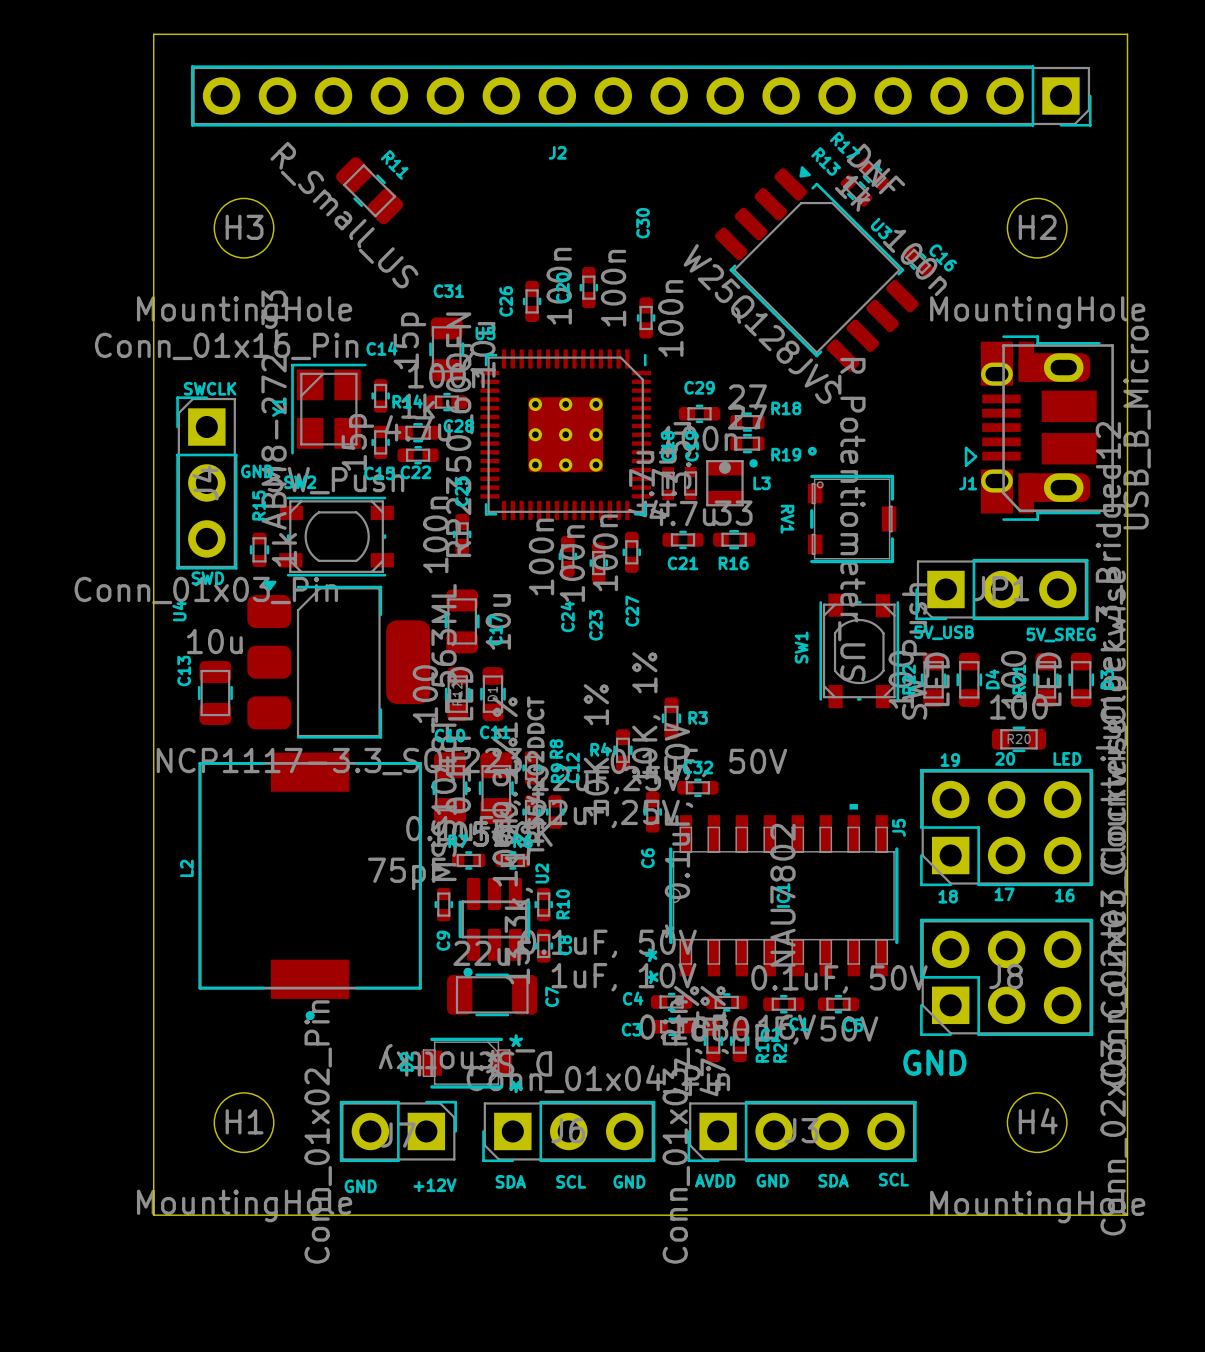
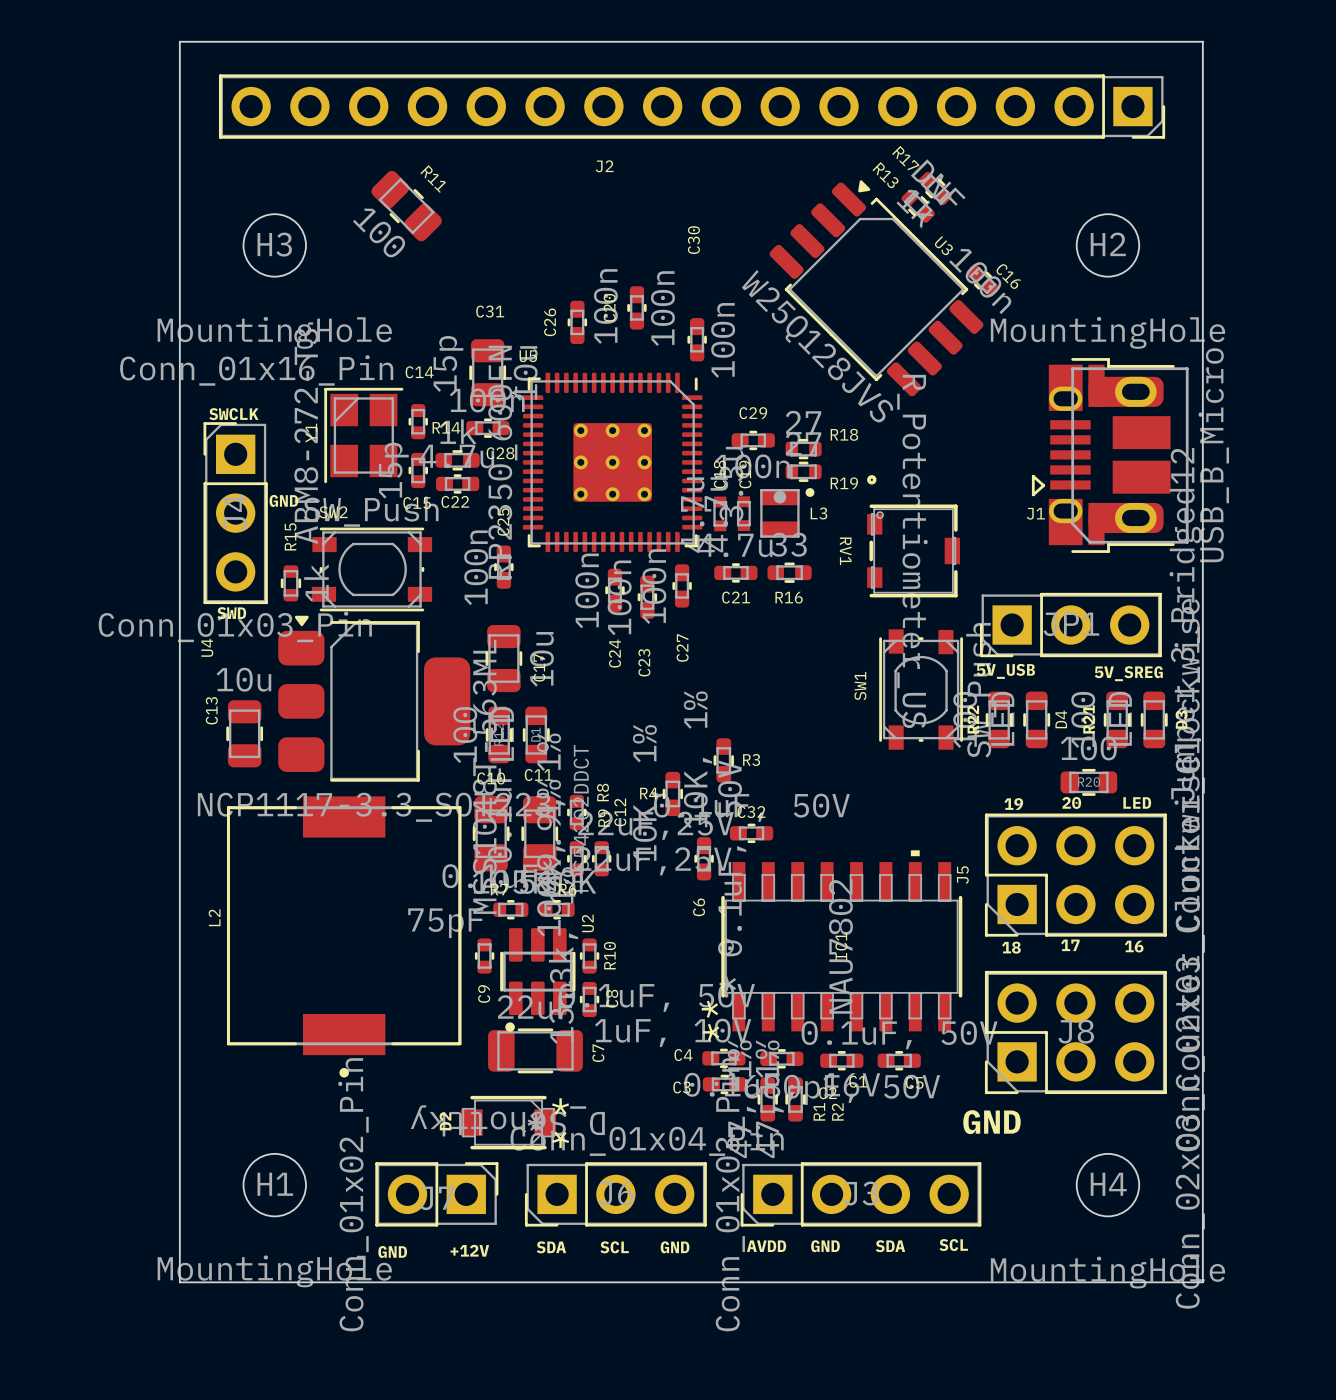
R11 value: R_Small_US (344, 215) -> 100 (379, 233)

